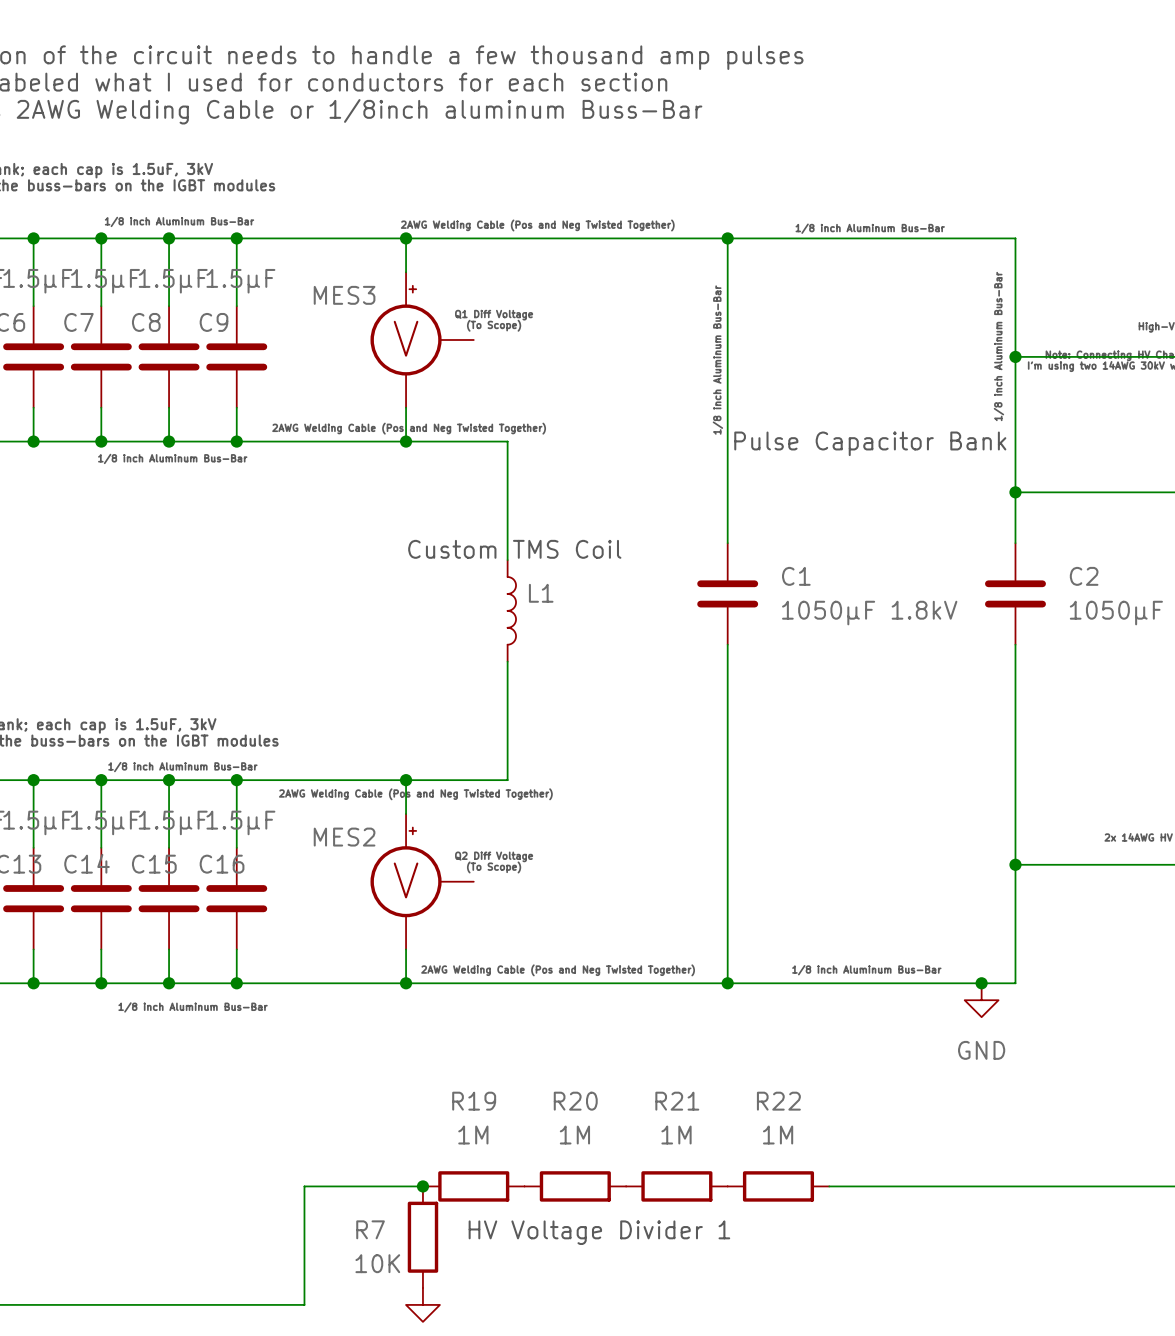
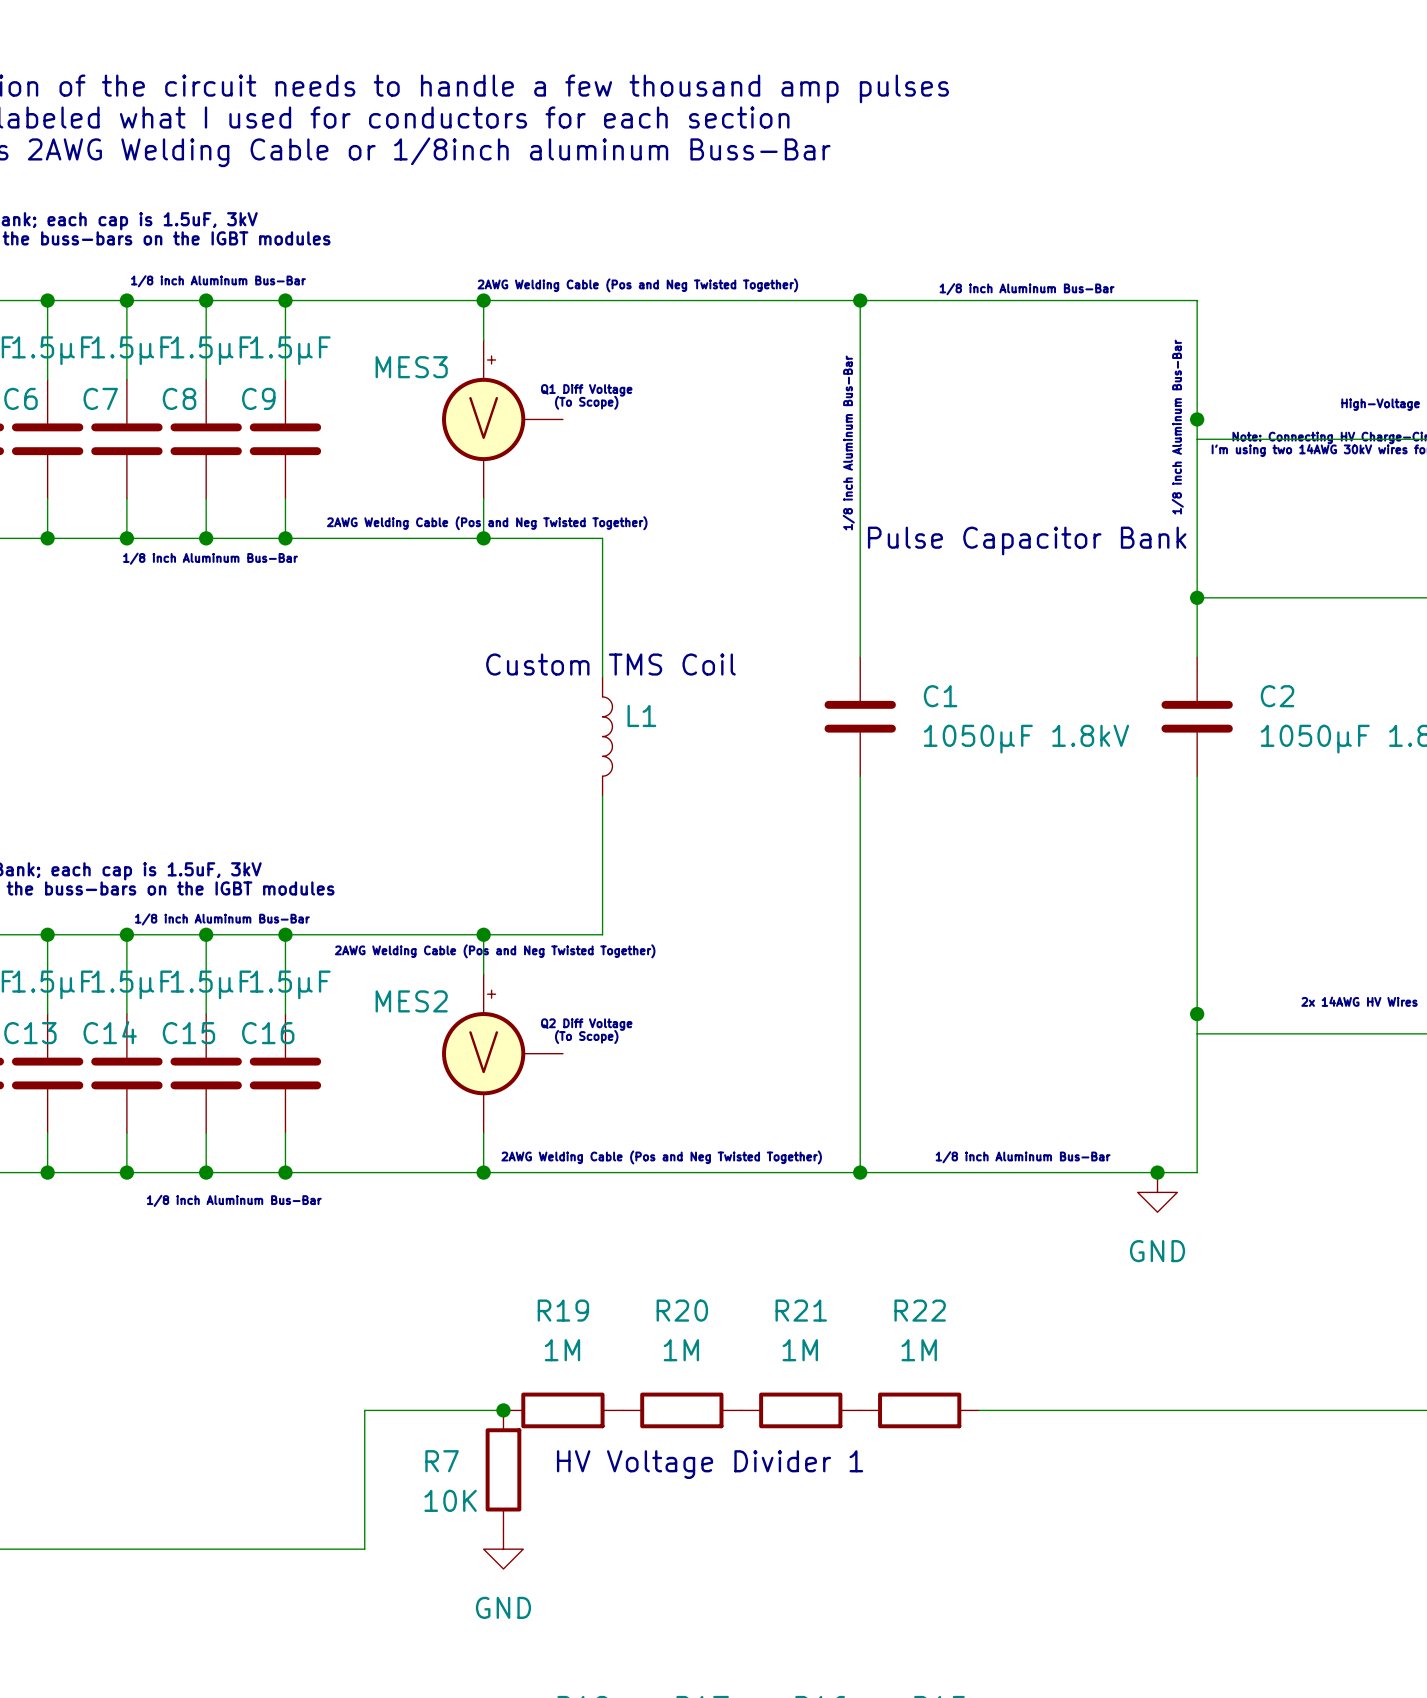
junction position: (1015, 356) -> (1197, 419)
junction position: (1015, 864) -> (1197, 1014)

